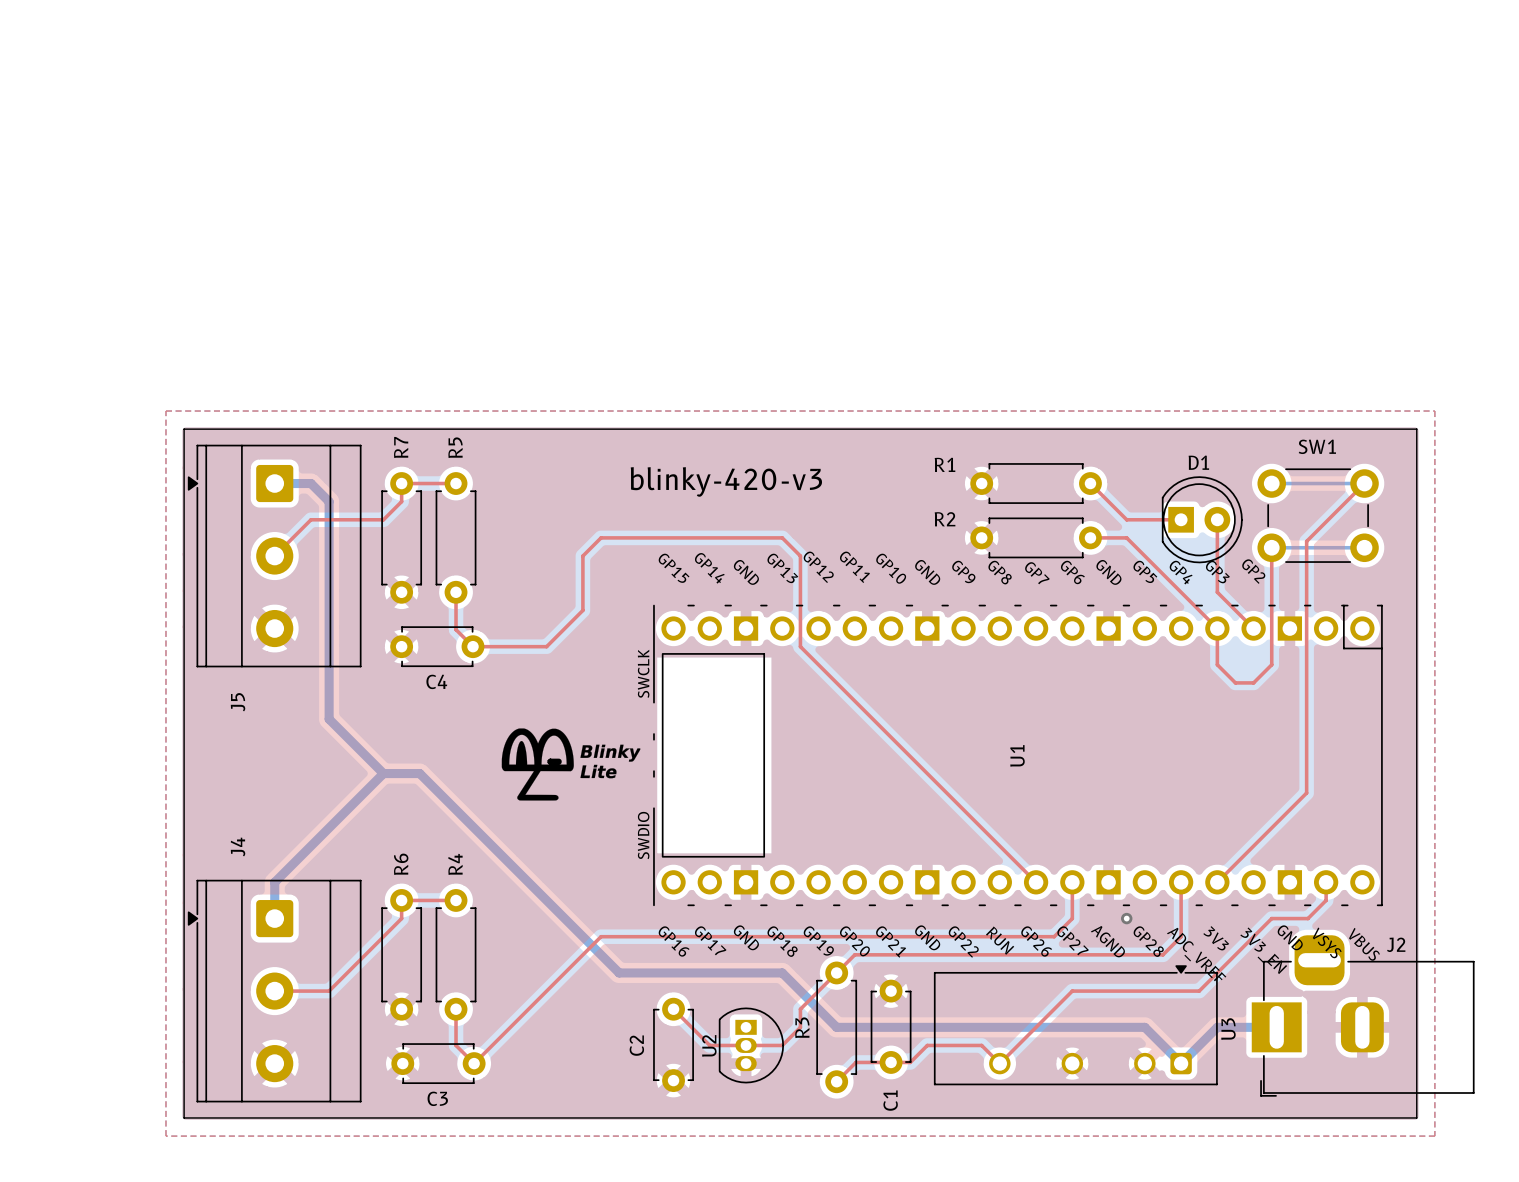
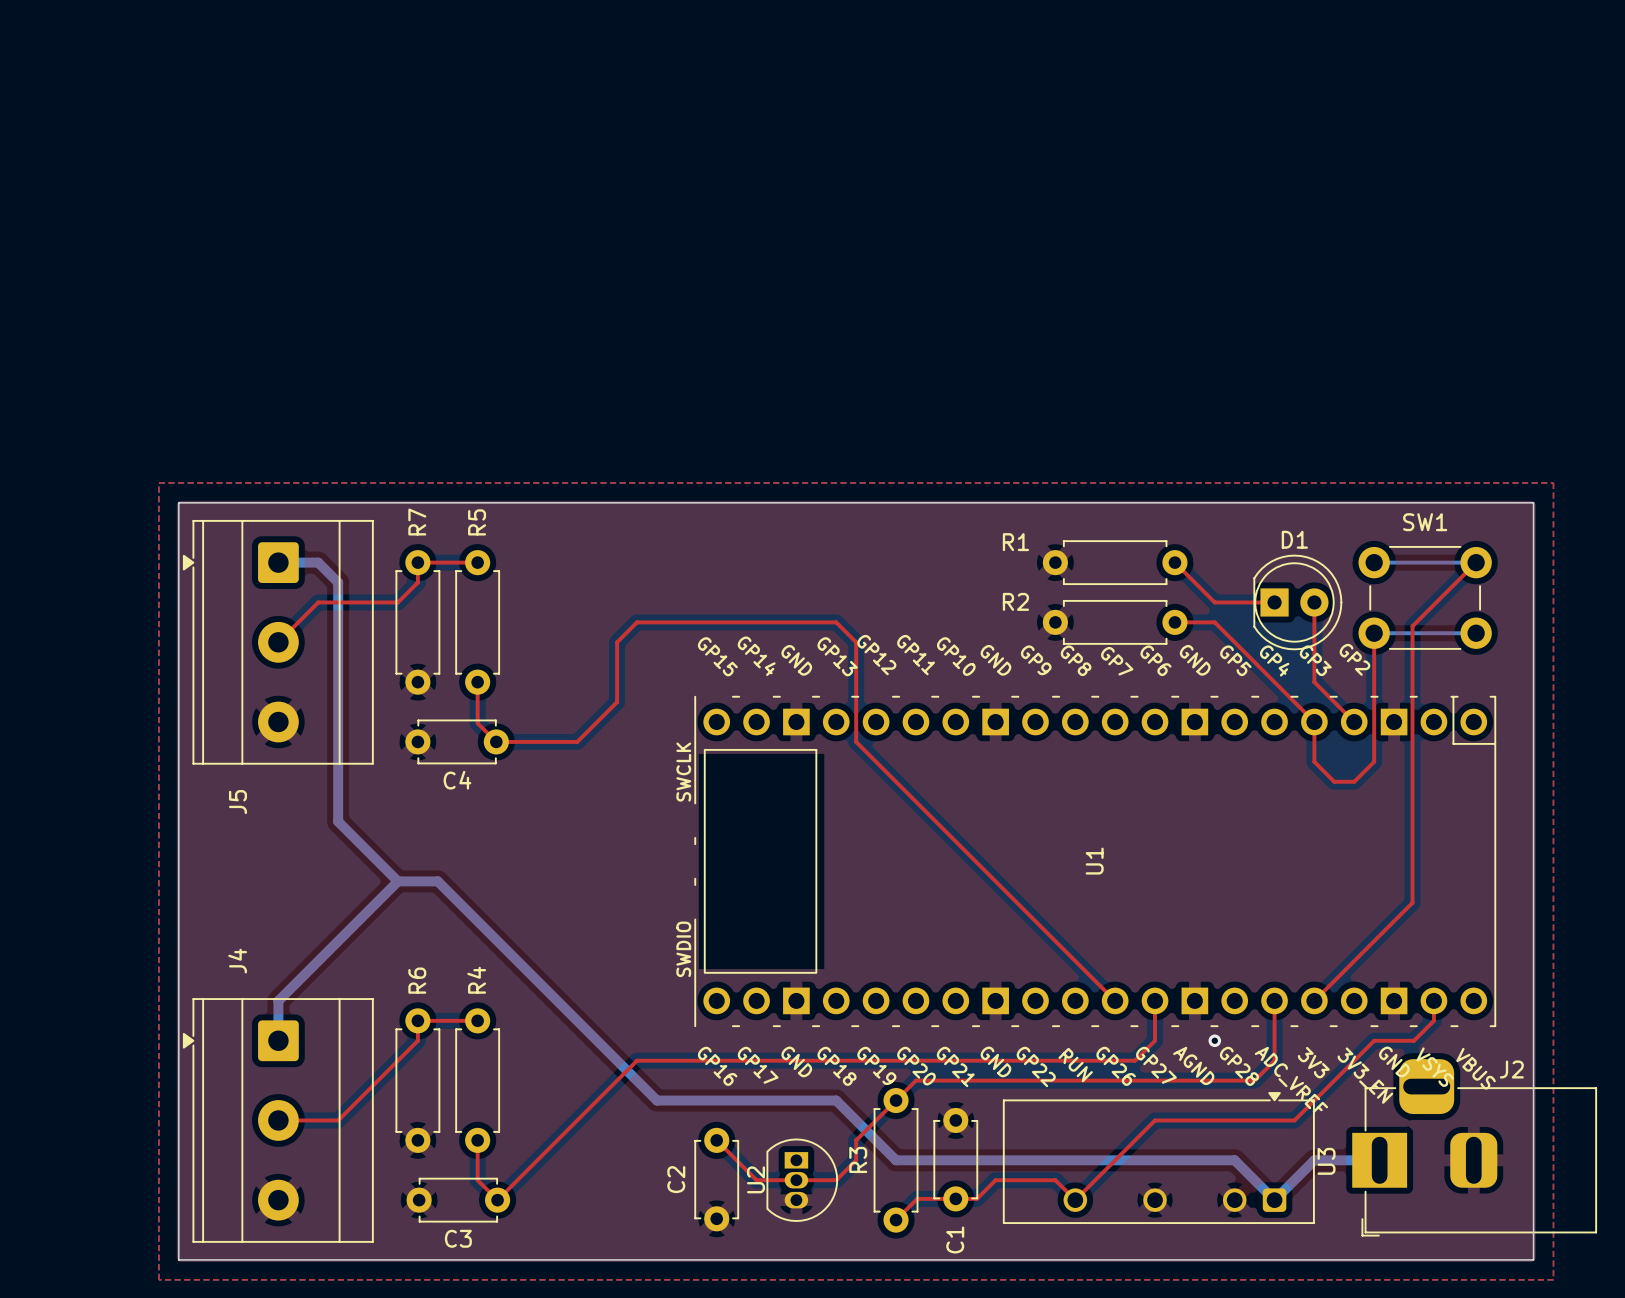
text: blinky-420-v3 (726, 481) -> none
drawing: [501, 728, 641, 801] -> none

